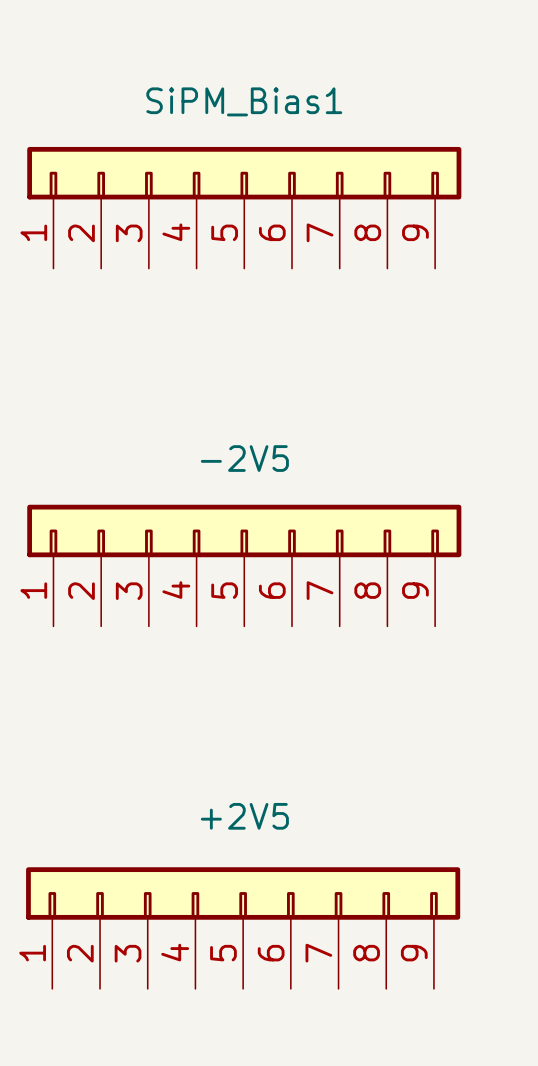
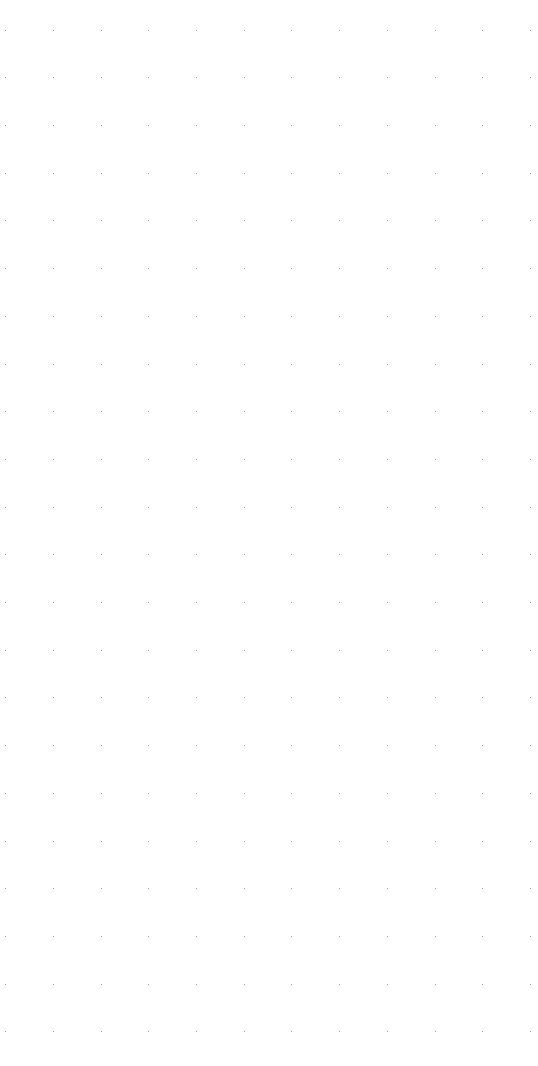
SiPM_Bias1: (244, 207) -> none
-2V5: (244, 565) -> none
+2V5: (243, 928) -> none

